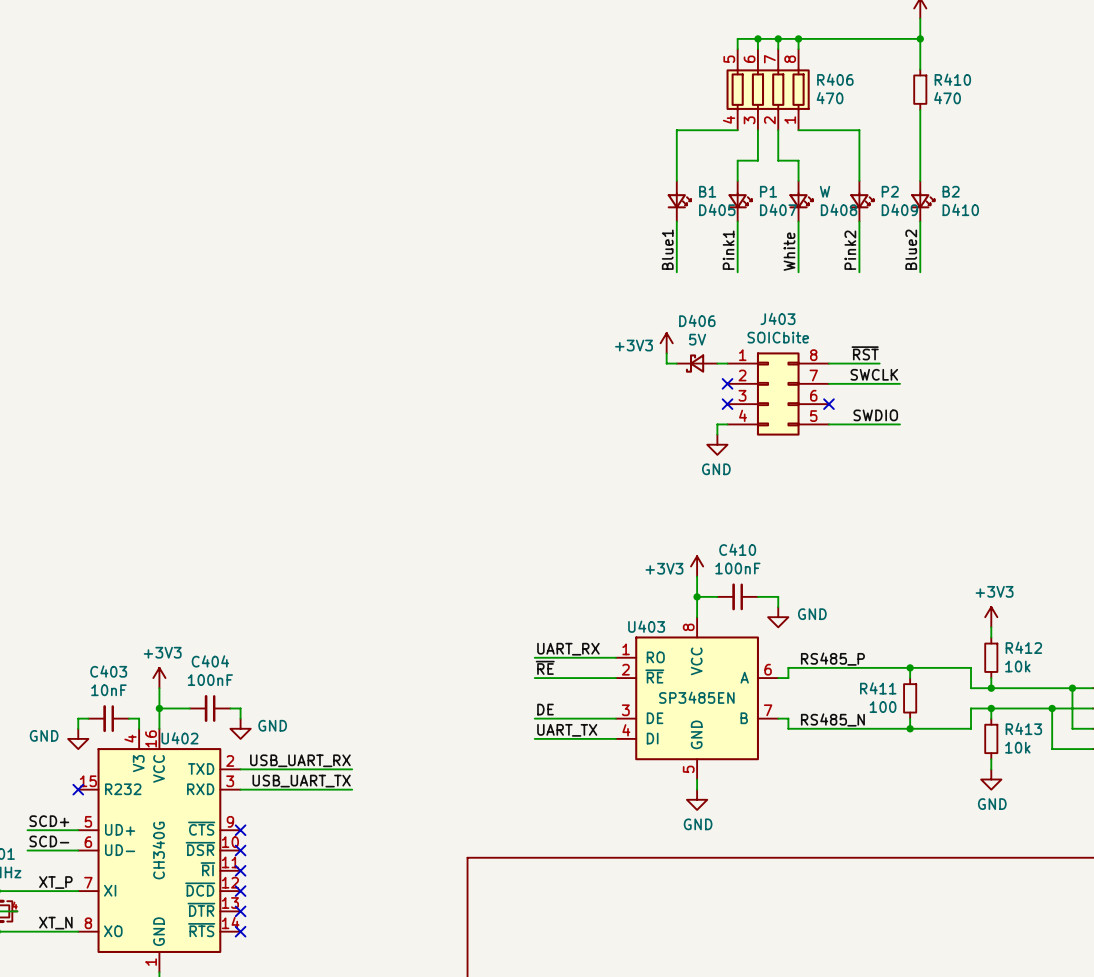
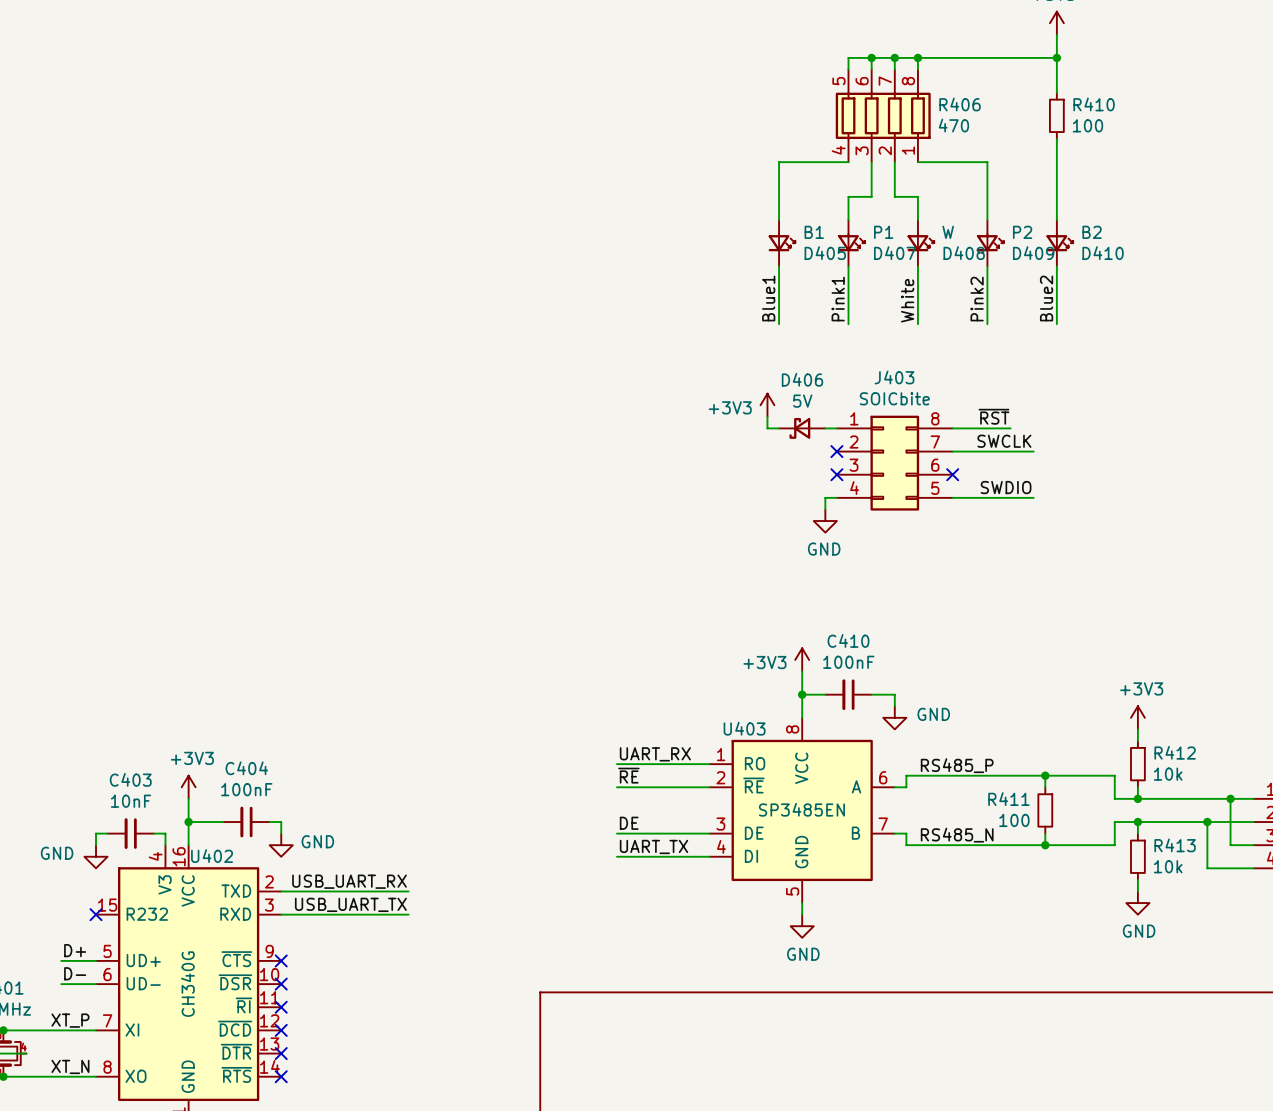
R410 value: 470 (947, 98) -> 100 (1088, 125)
label: SCD+ (49, 821) -> D+ (75, 950)
wire: (27, 830) (47, 830) -> none
label: SCD- (49, 841) -> D- (75, 973)
wire: (27, 850) (47, 850) -> none

